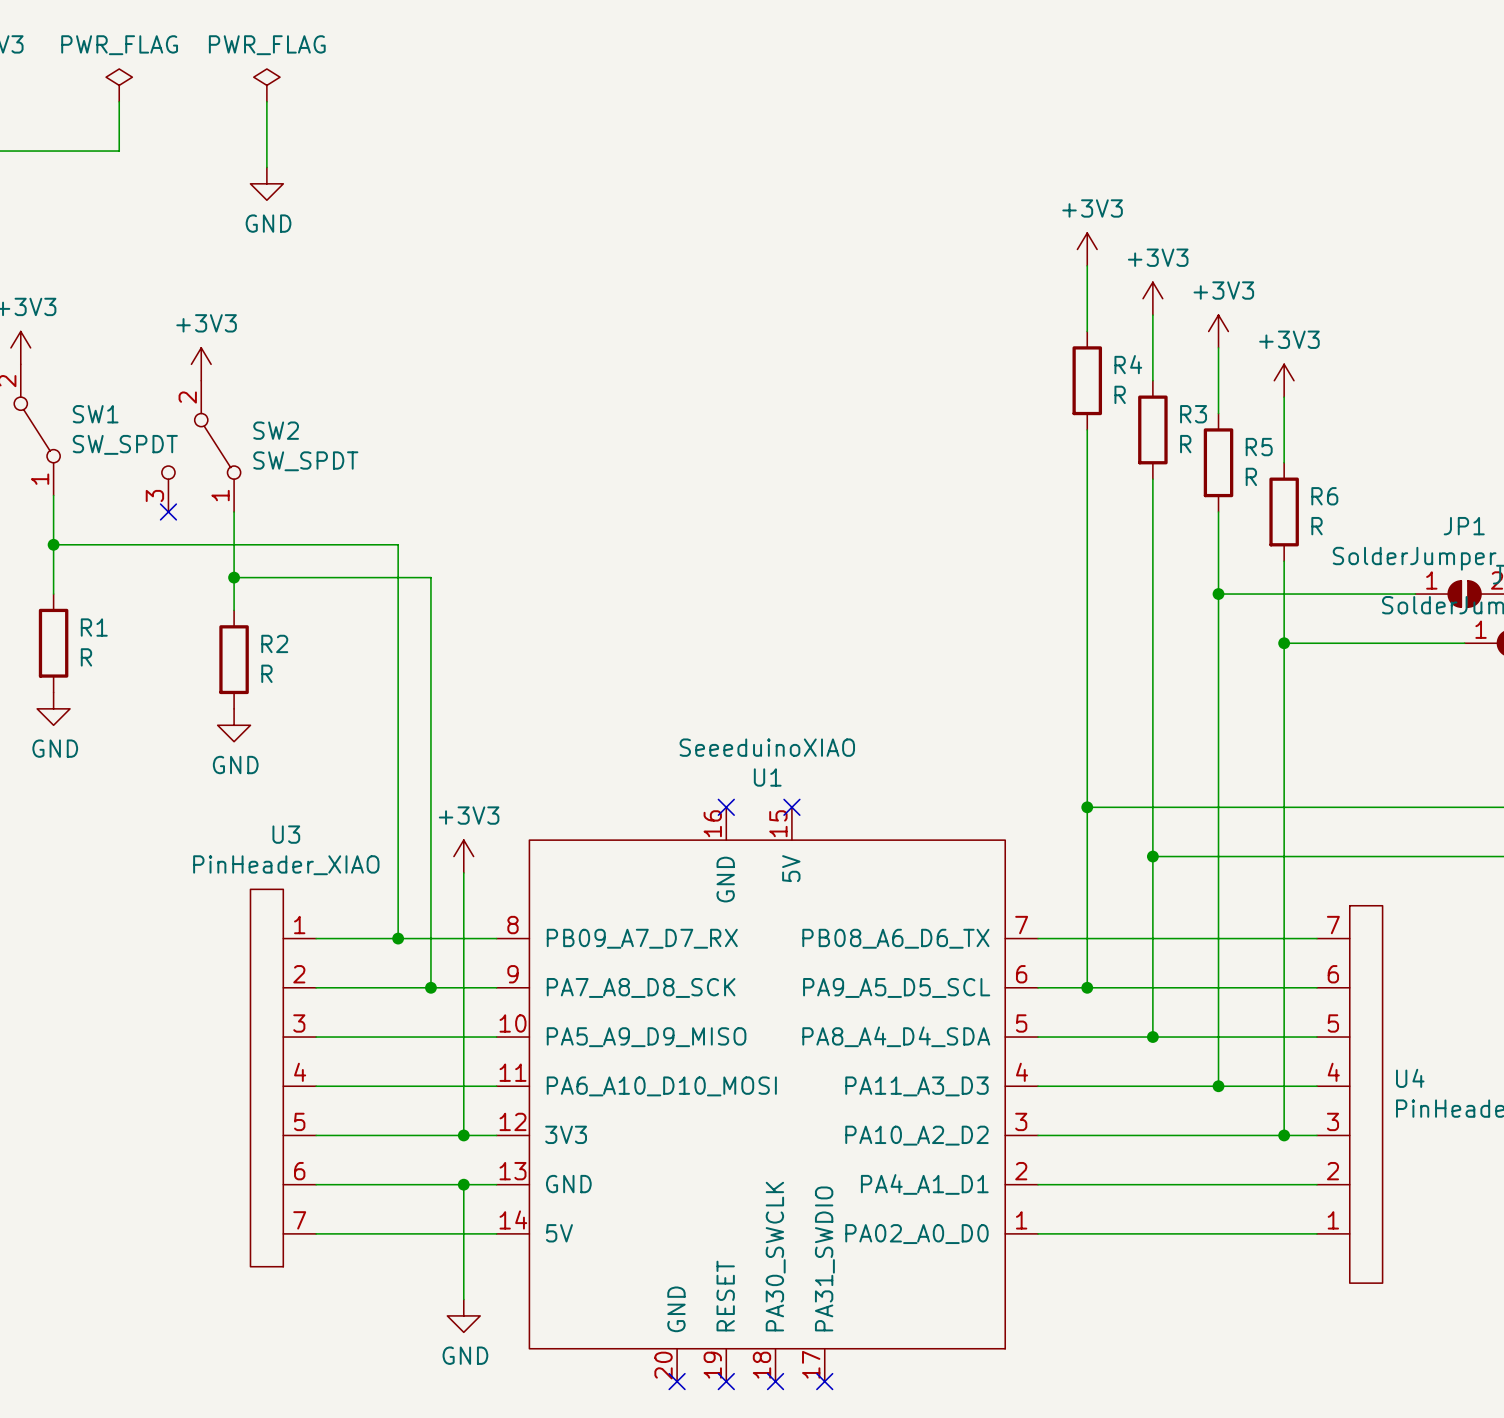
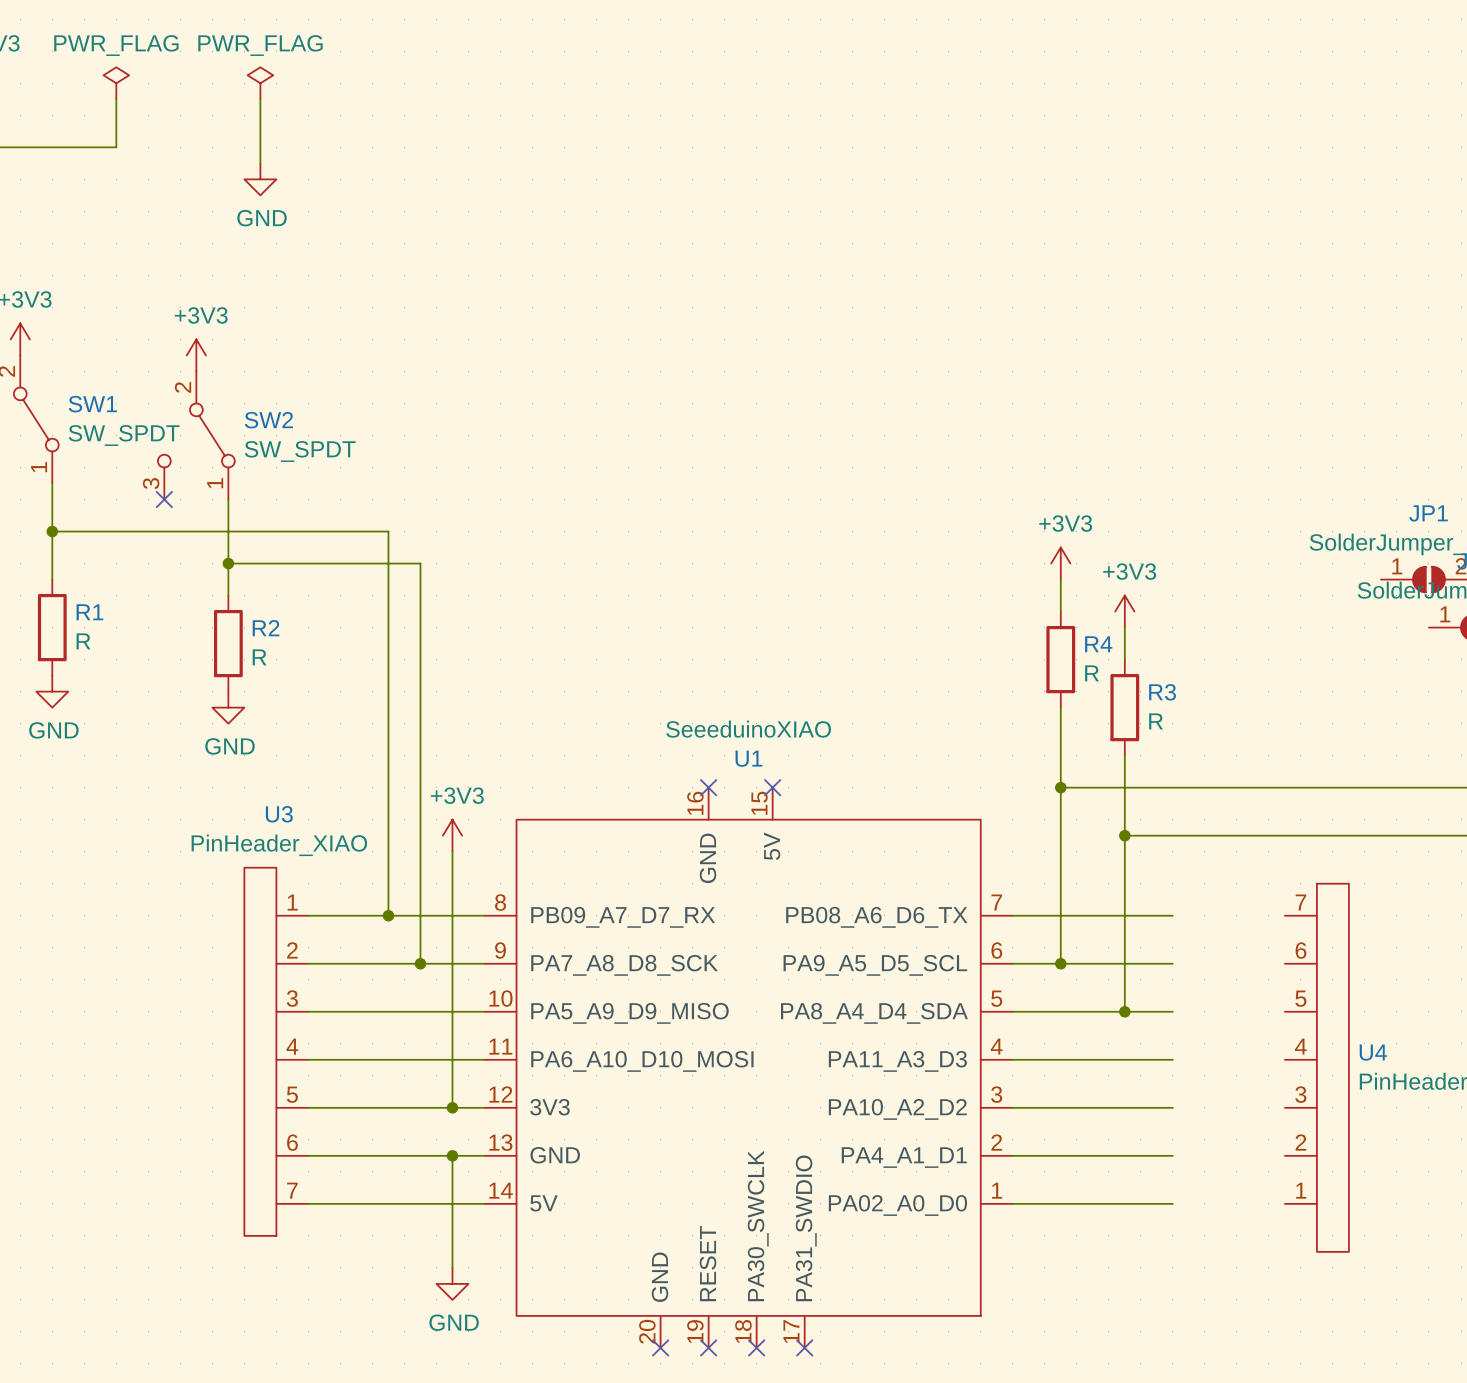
power symbol: +3V3 (1087, 249) -> none
wire: (1087, 265) (1087, 331) -> none
power symbol: +3V3 (1152, 298) -> none
wire: (1152, 315) (1152, 380) -> none
power symbol: +3V3 (1218, 331) -> none
wire: (1218, 347) (1218, 413) -> none
R4 position: (1087, 380) -> (1060, 659)
power symbol: +3V3 (1284, 380) -> none
wire: (1284, 397) (1284, 462) -> none
wire: (1087, 429) (1087, 594) -> none
R3 position: (1152, 429) -> (1124, 707)
R5: R (1218, 462) -> none
wire: (1152, 479) (1152, 643) -> none
wire: (1218, 511) (1218, 1086) -> none
R6: R (1284, 511) -> none
wire: (1284, 561) (1284, 1135) -> none
power symbol: none -> +3V3 (1060, 563)
wire: (1218, 594) (1415, 594) -> none
junction: (1218, 594) -> none
wire: (1087, 626) (1087, 725) -> none
power symbol: none -> +3V3 (1124, 611)
wire: (1284, 643) (1464, 643) -> none
junction: (1284, 643) -> none
wire: (1152, 676) (1152, 774) -> none
wire: (1202, 938) (1316, 938) -> none
wire: (1202, 987) (1316, 987) -> none
wire: (1202, 1037) (1316, 1037) -> none
wire: (1202, 1086) (1316, 1086) -> none
junction: (1218, 1086) -> none
wire: (1202, 1135) (1316, 1135) -> none
junction: (1284, 1135) -> none
wire: (1202, 1184) (1316, 1184) -> none
wire: (1202, 1233) (1316, 1233) -> none

